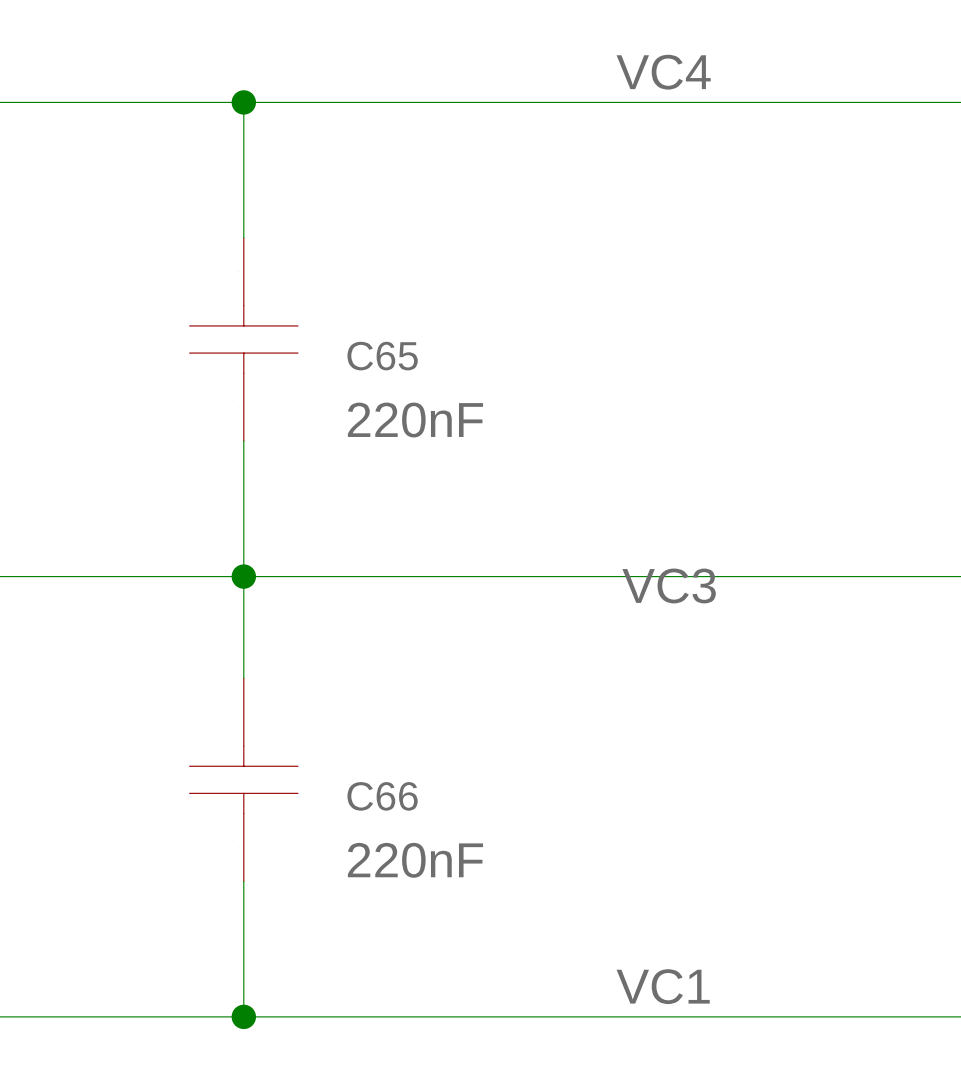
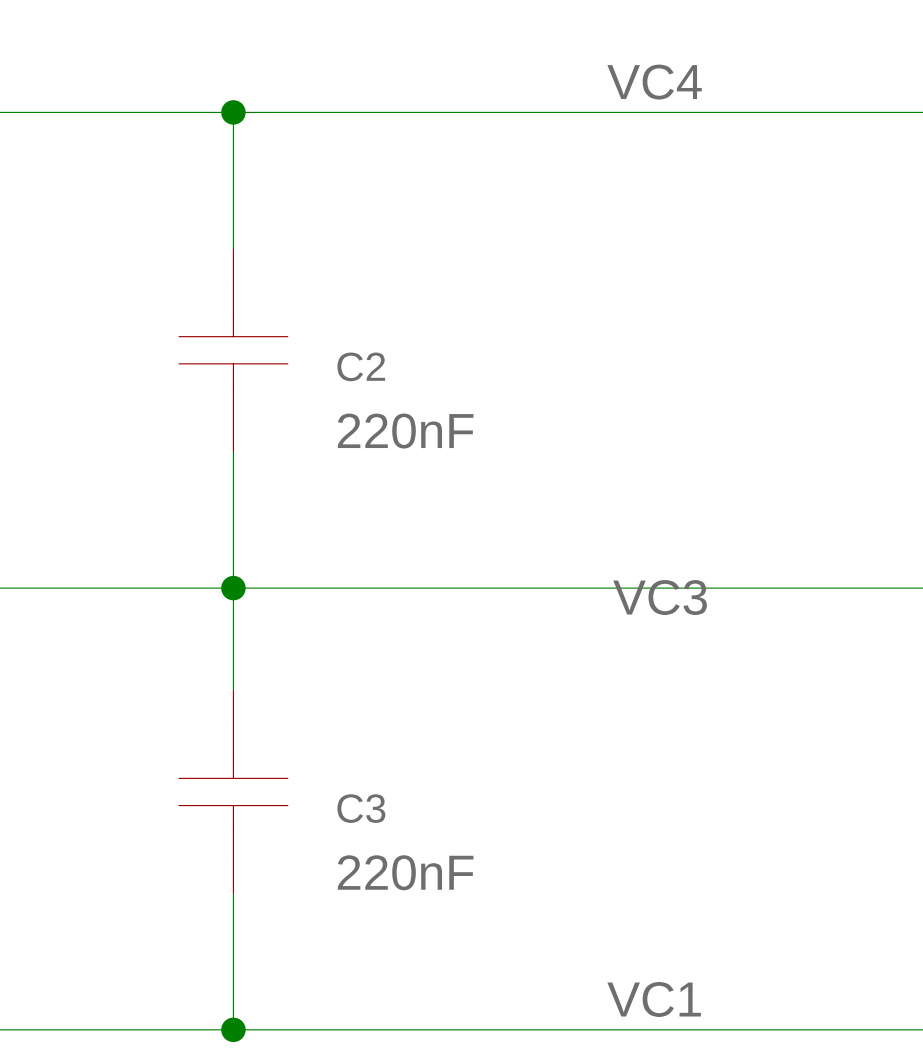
C65 name: C65 (382, 356) -> C2 (361, 366)
C66 name: C66 (382, 796) -> C3 (361, 808)

